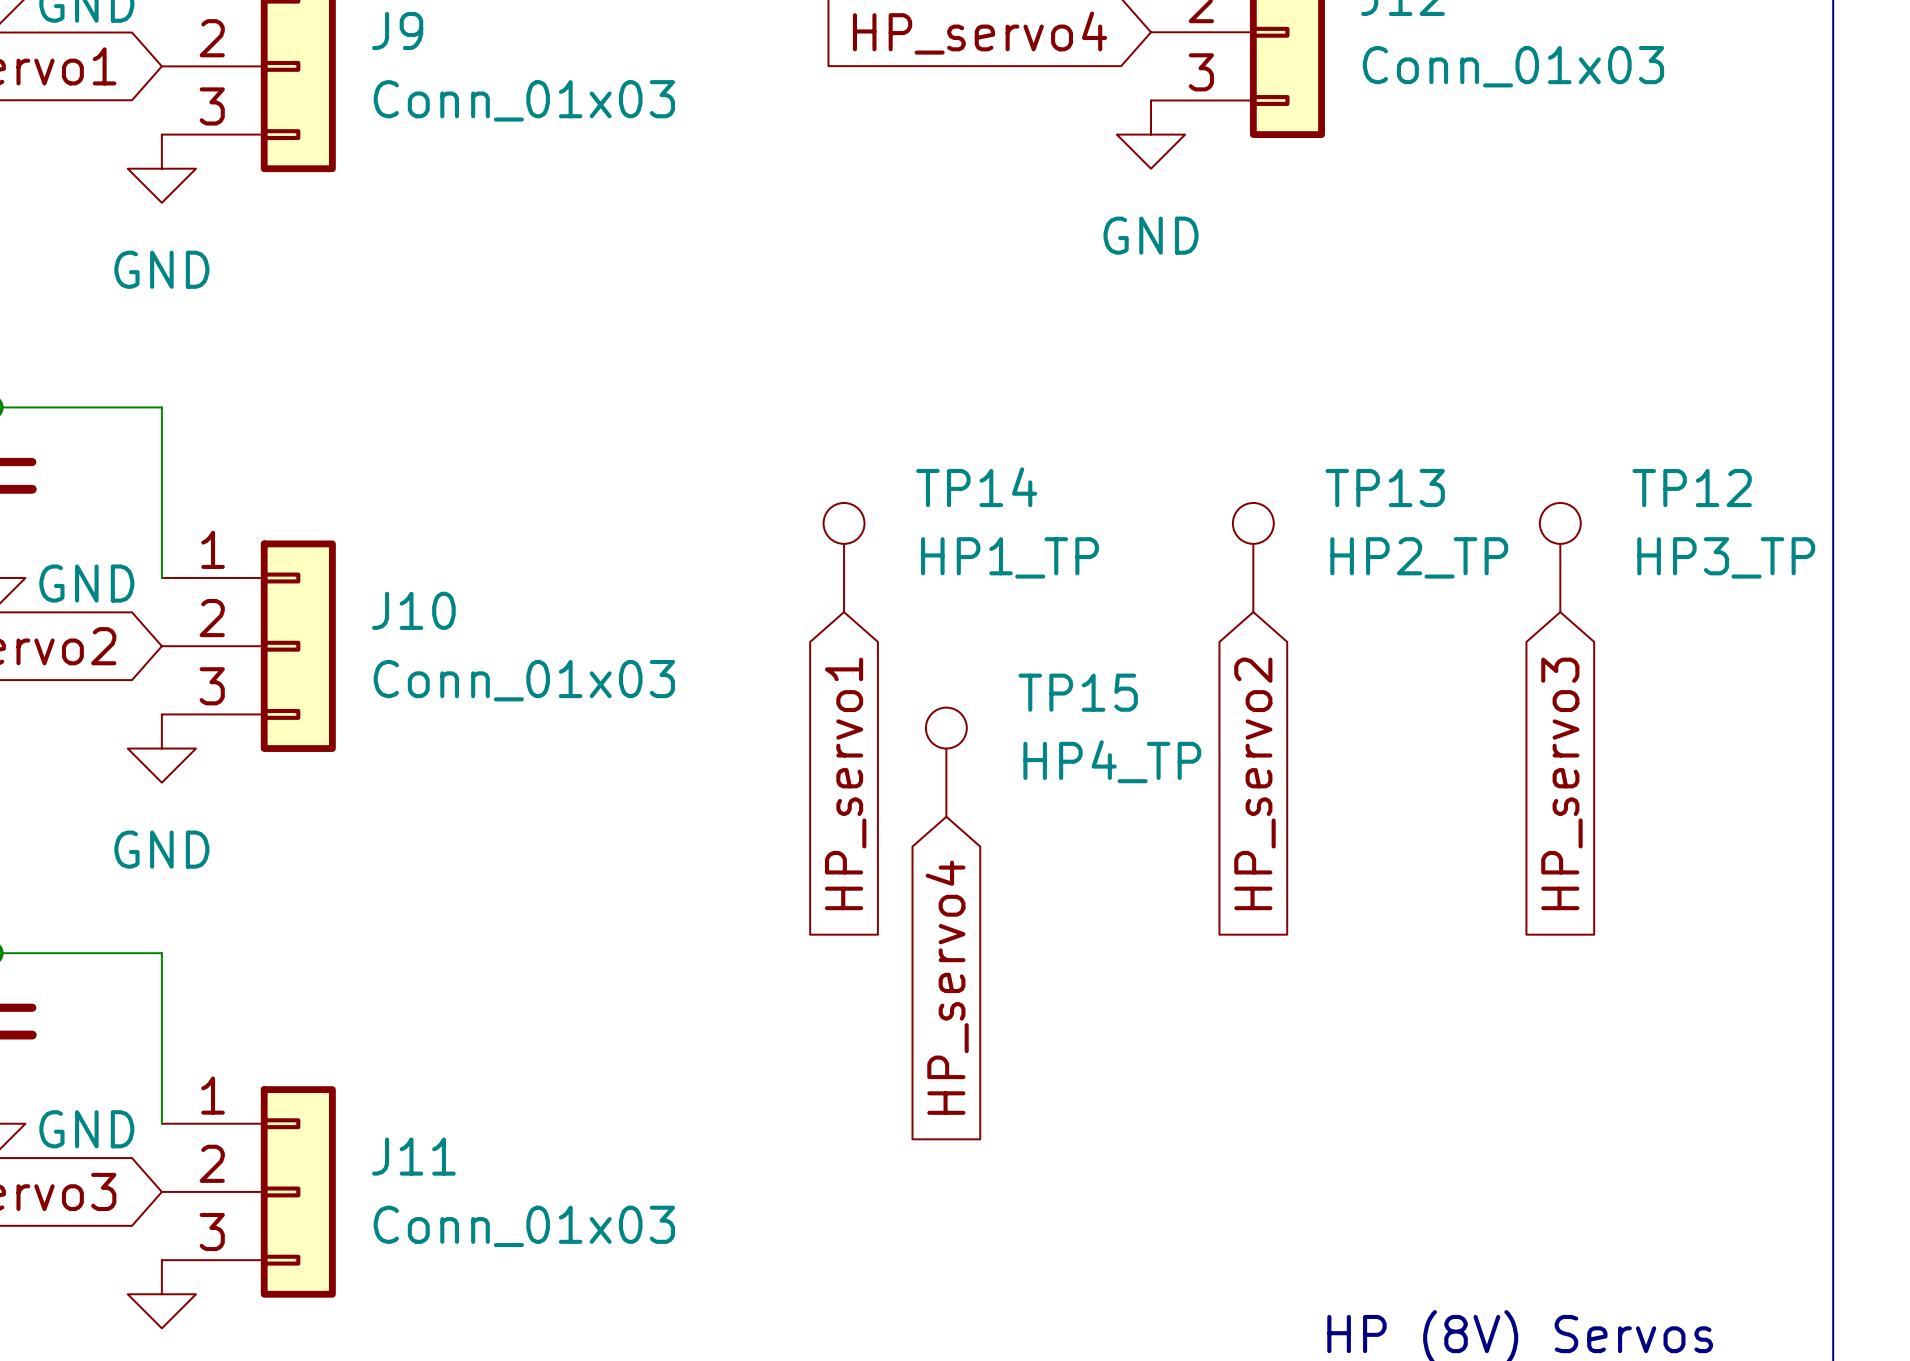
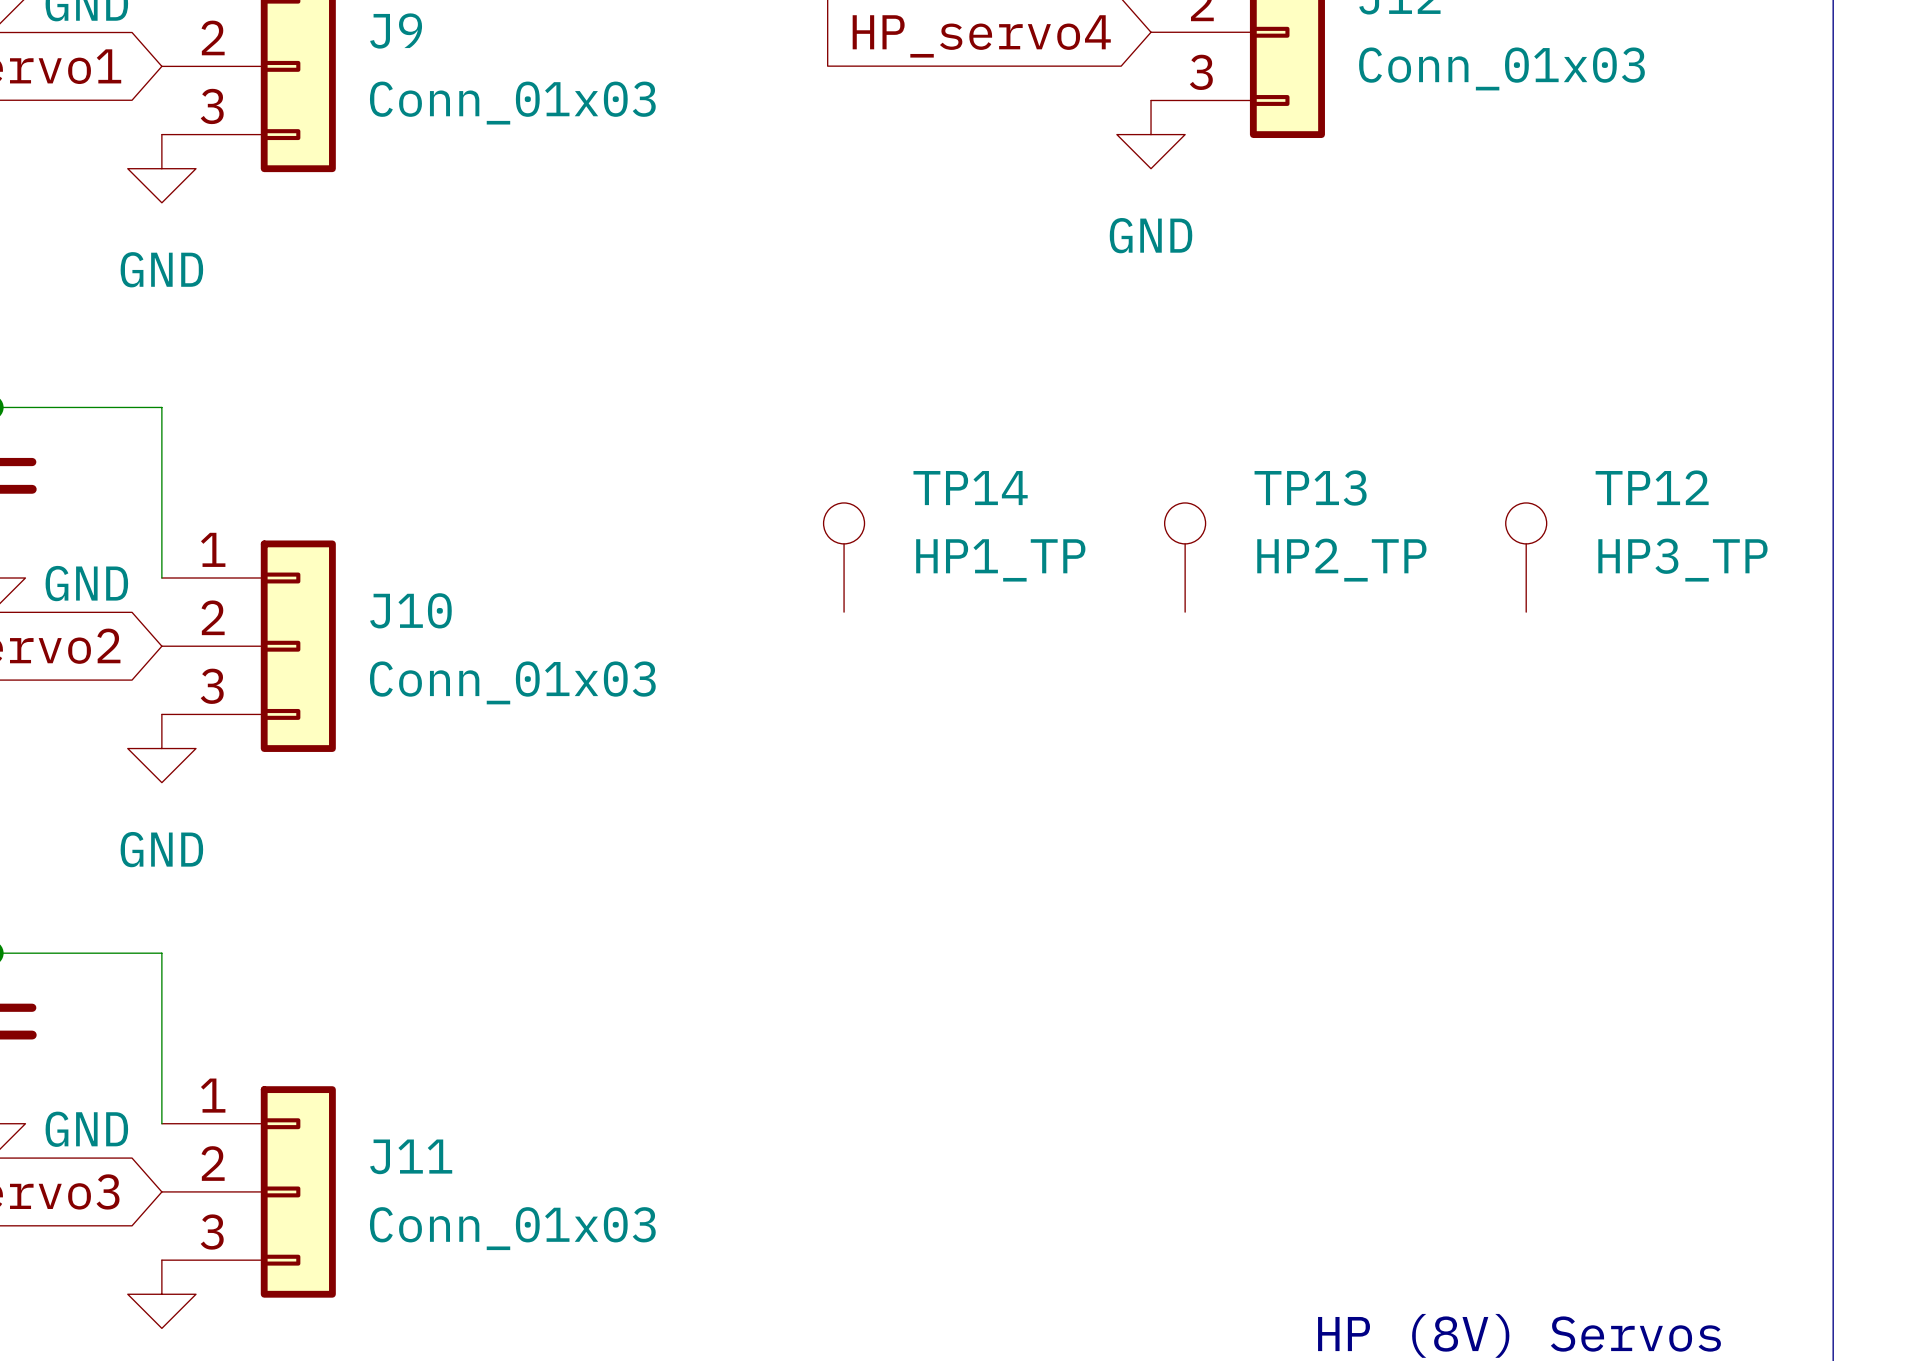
TP13 position: (1253, 557) -> (1185, 557)
TP12 position: (1560, 557) -> (1526, 557)
TP15: HP4_TP (946, 762) -> none
global label: HP_servo1 (845, 783) -> none
global label: HP_servo2 (1254, 783) -> none
global label: HP_servo3 (1561, 783) -> none
global label: HP_servo4 (947, 987) -> none

